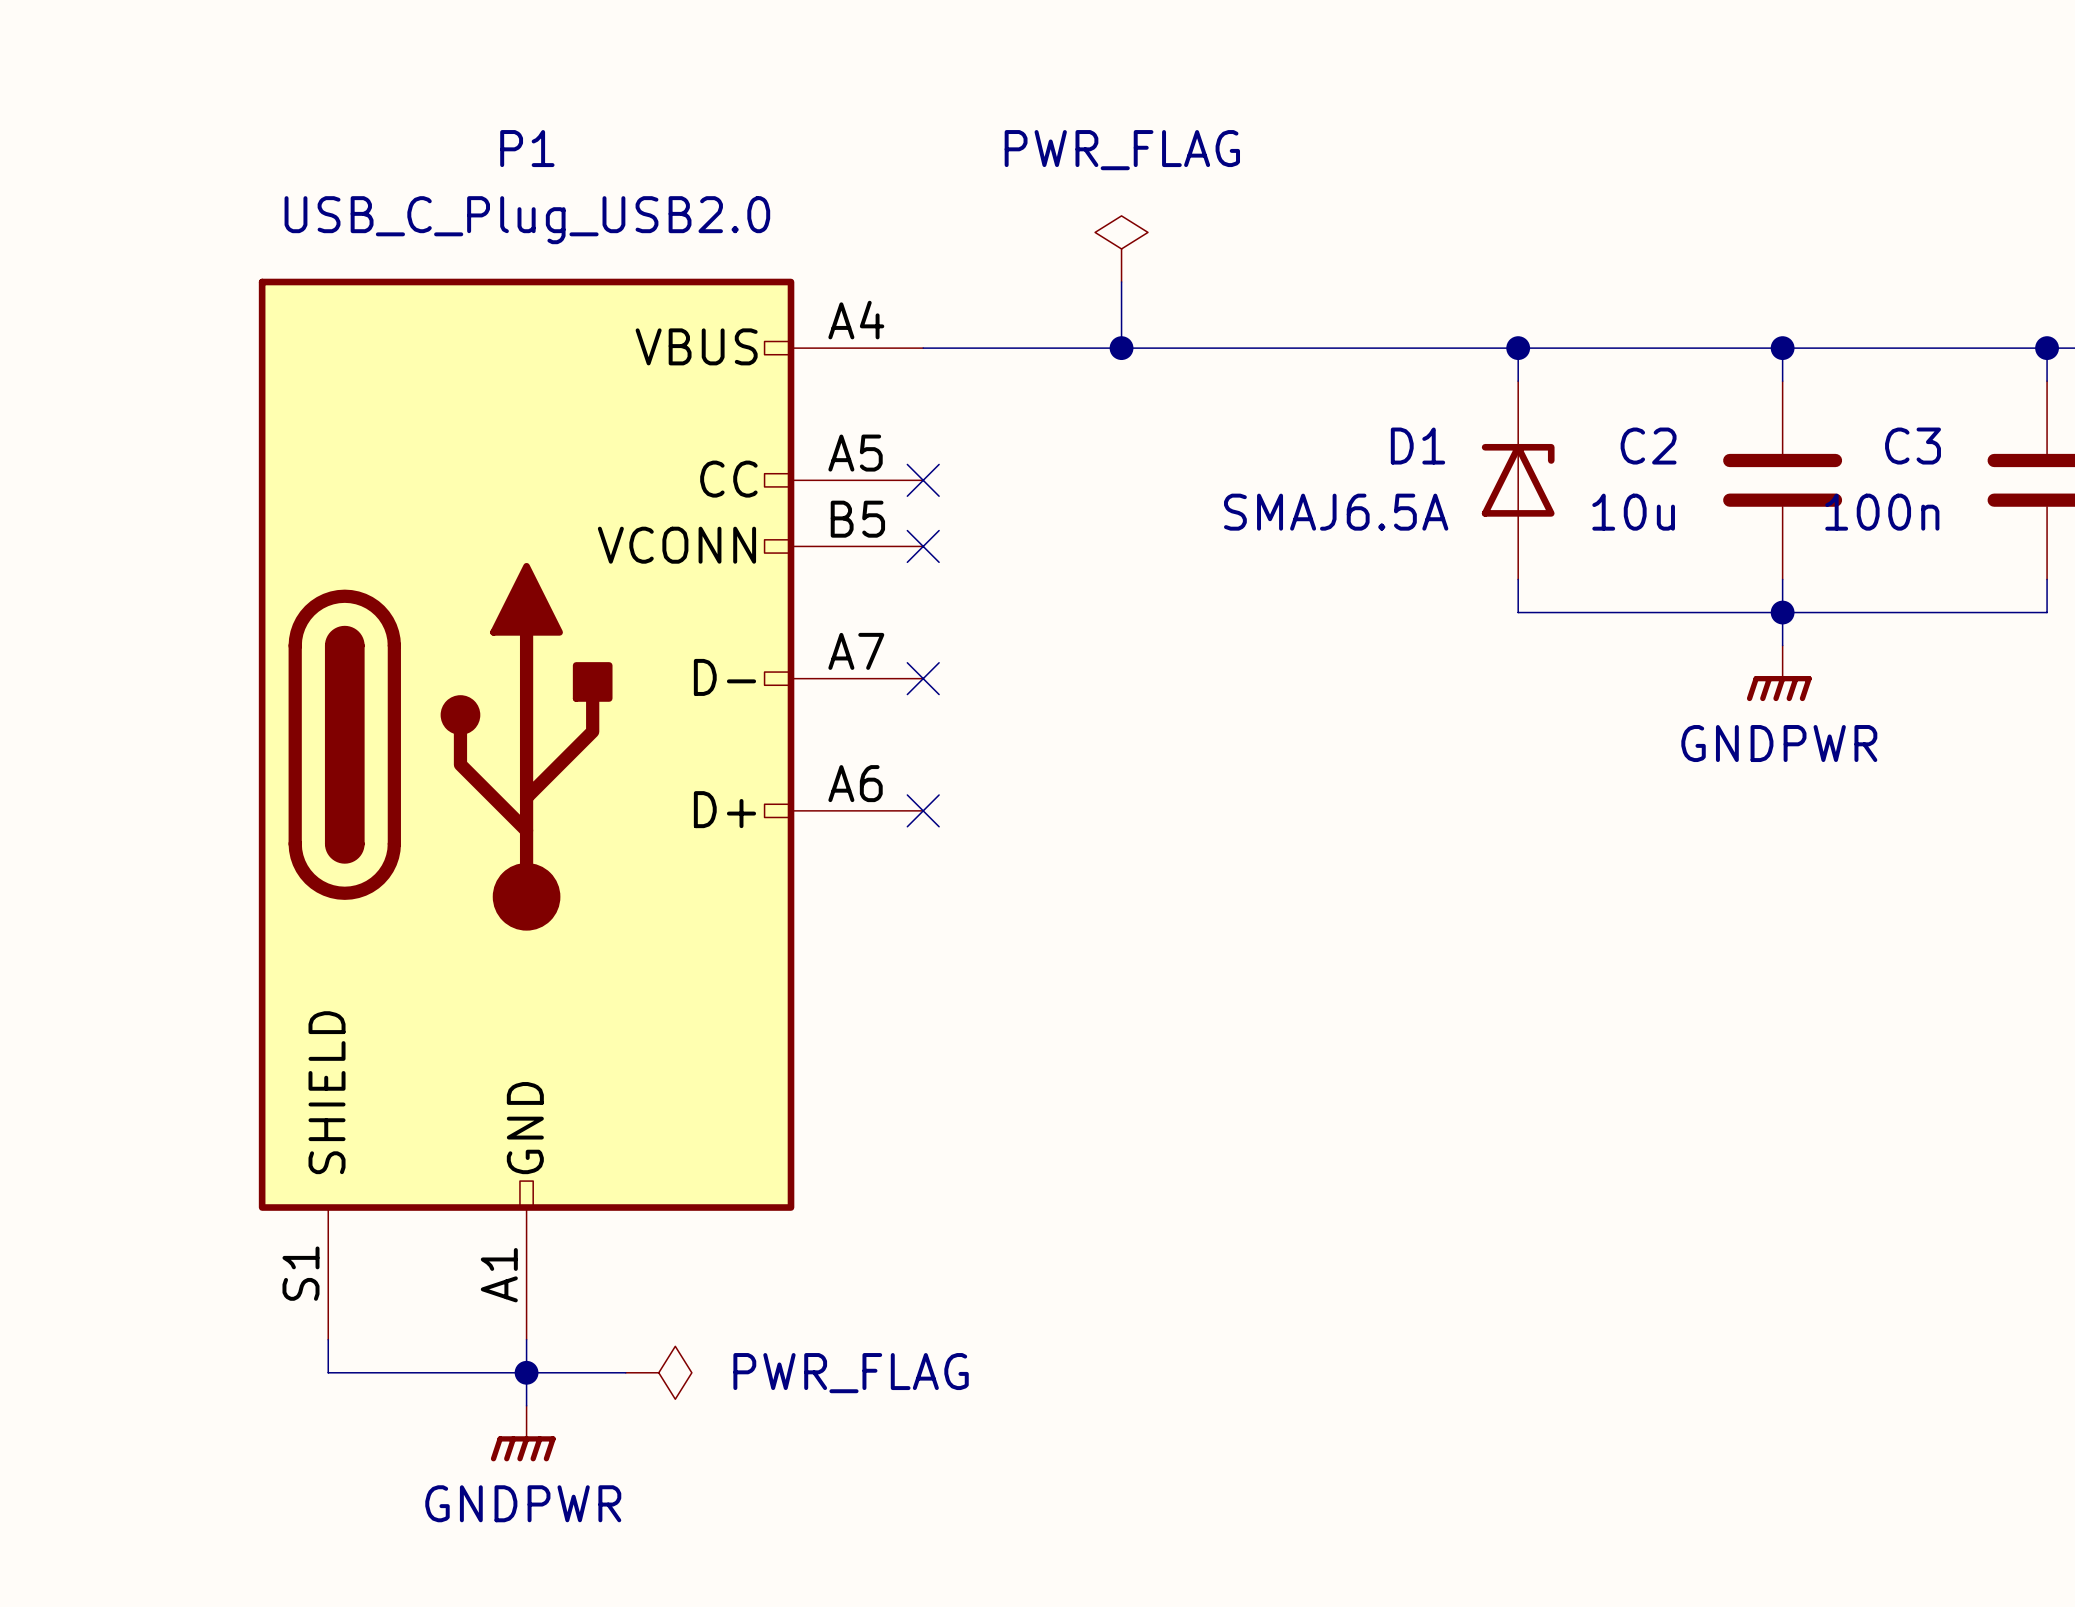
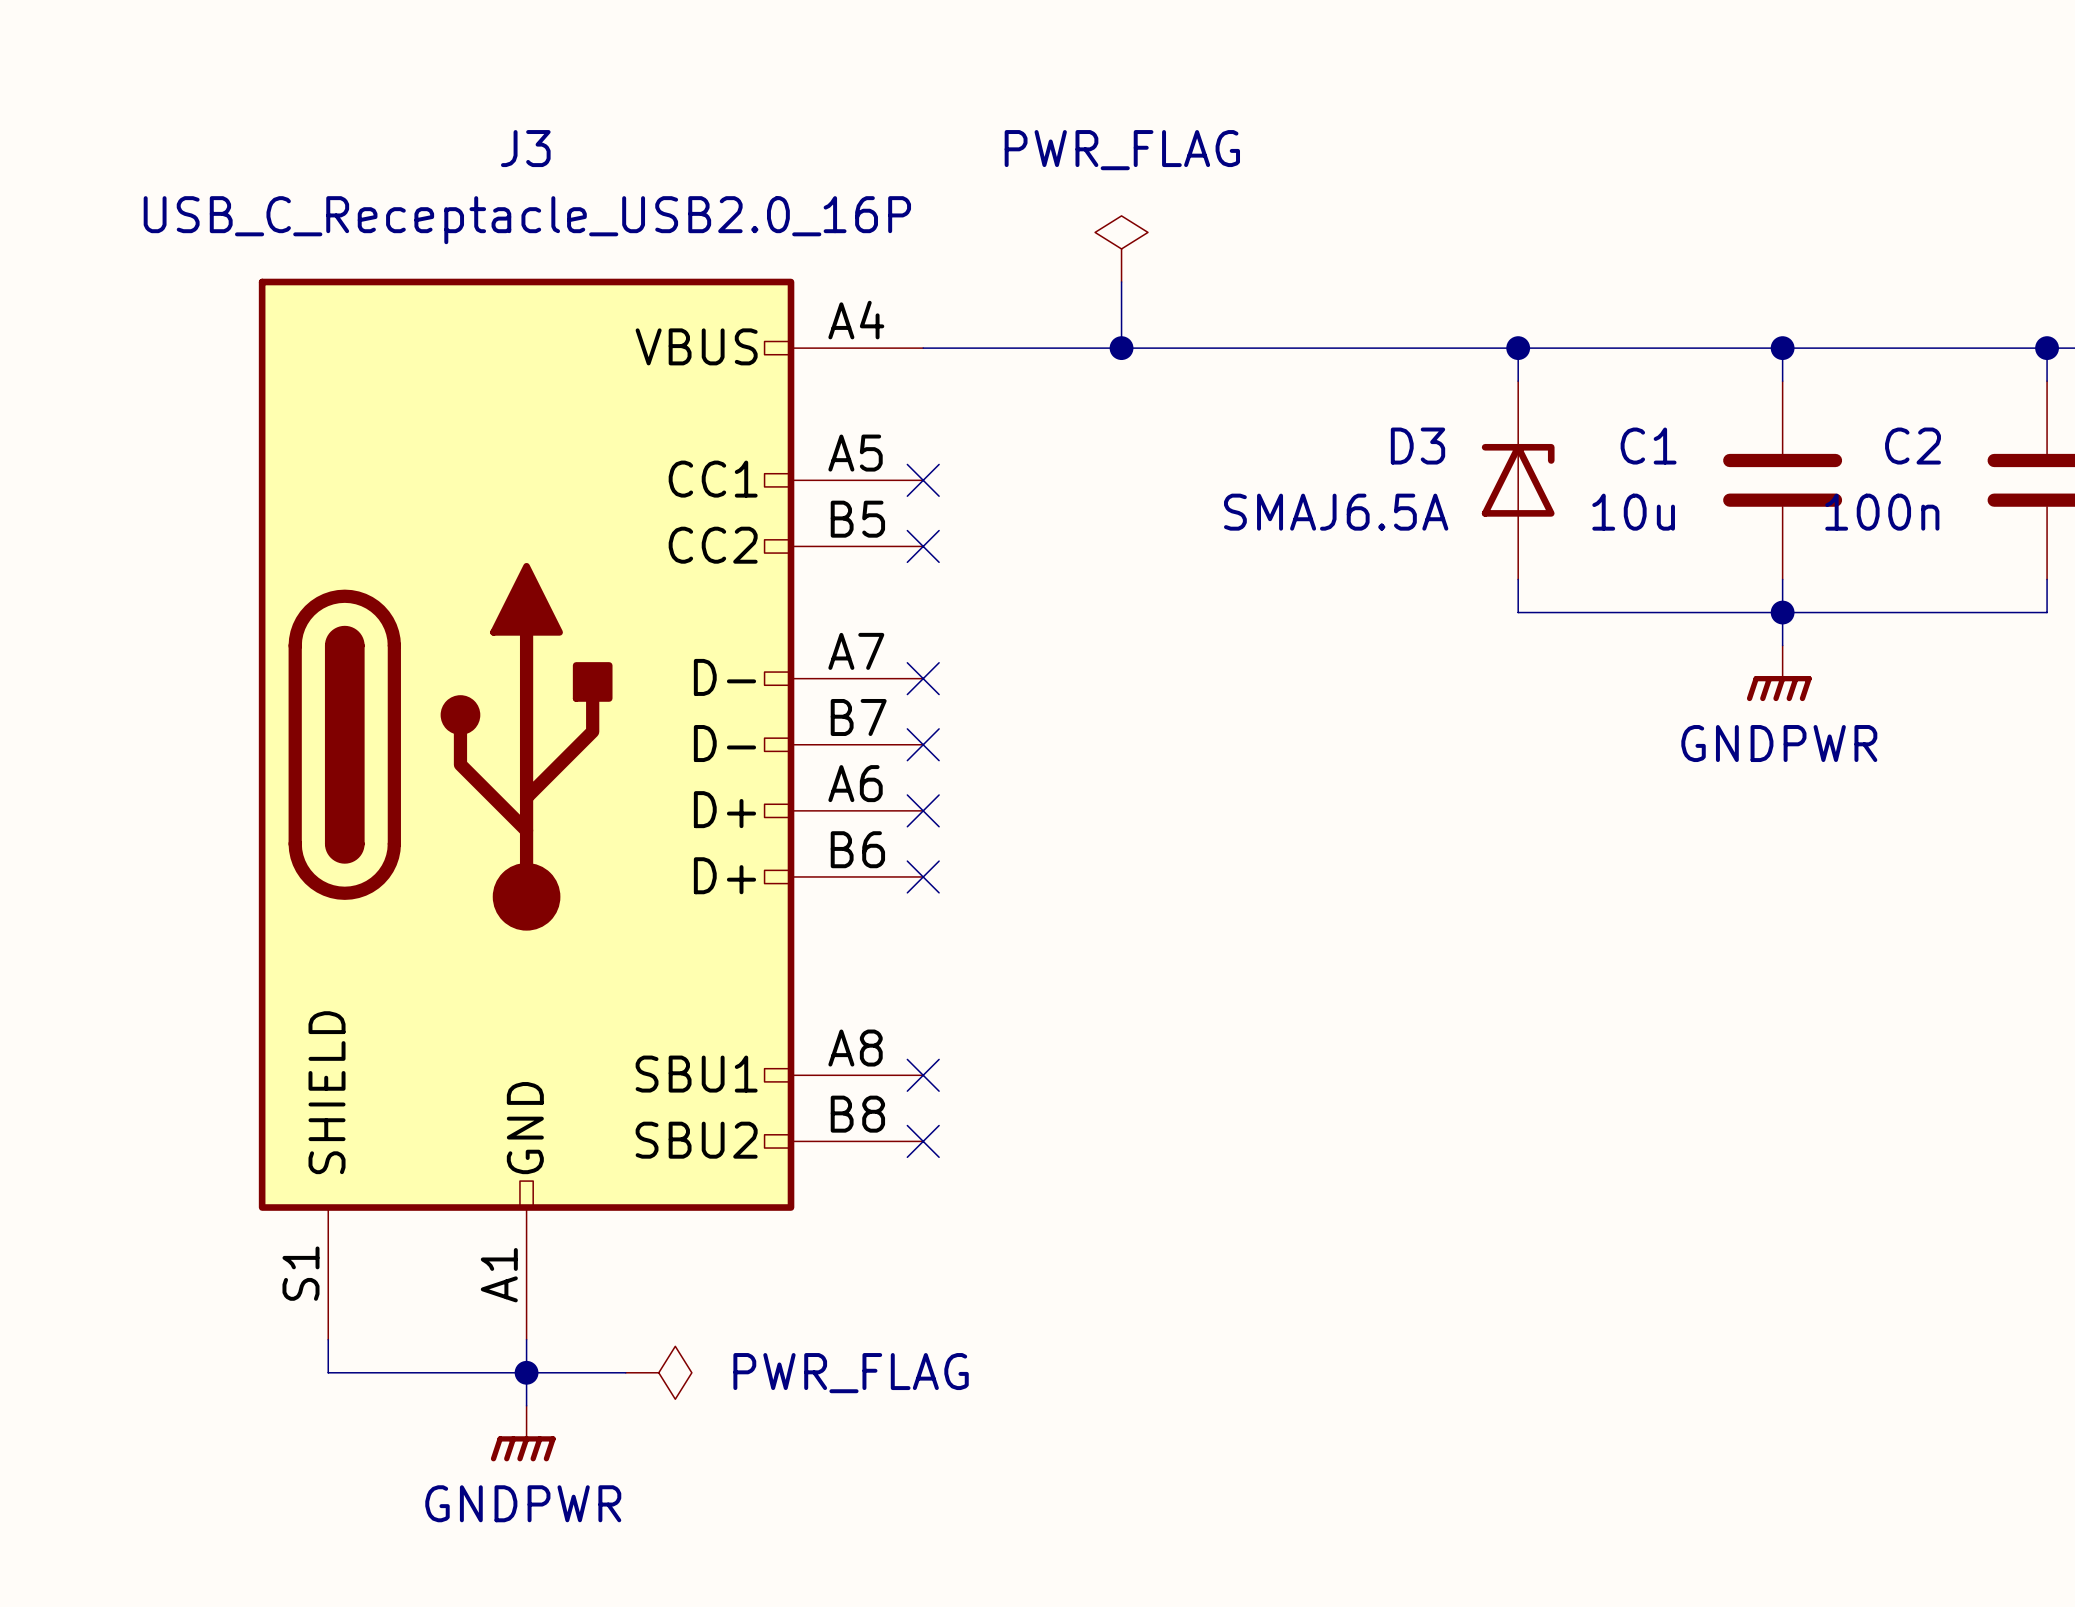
D1 name: D1 (1417, 446) -> D3 (1417, 446)
C2 name: C2 (1648, 446) -> C1 (1648, 446)
C3 name: C3 (1913, 446) -> C2 (1913, 446)
no-connect mark: none -> (923, 744)
P1: USB_C_Plug_USB2.0 (591, 809) -> none
J3: none -> USB_C_Receptacle_USB2.0_16P (591, 809)
no-connect mark: none -> (923, 876)
no-connect mark: none -> (923, 1075)
no-connect mark: none -> (923, 1141)

